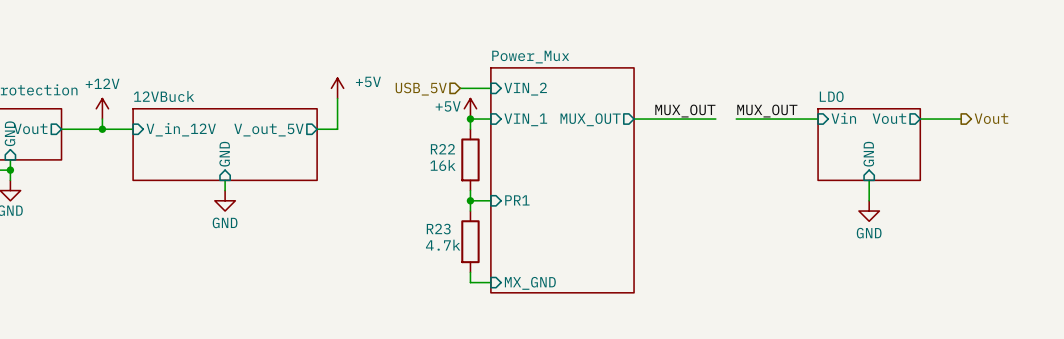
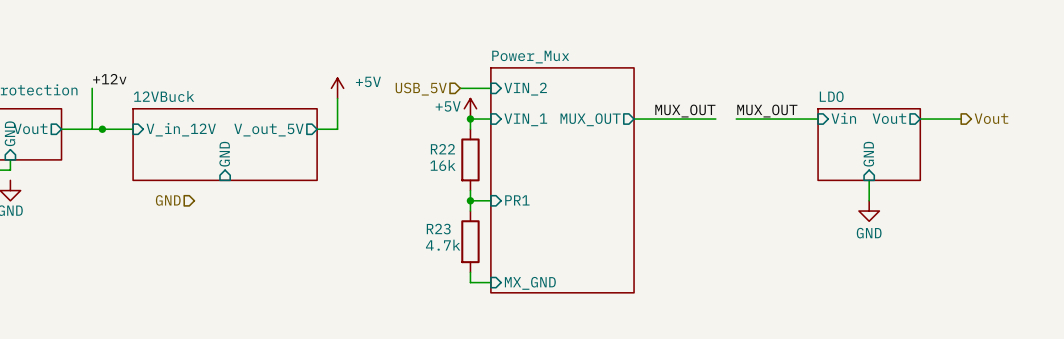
label: none -> +12v (109, 79)
wire: none -> (92, 88) (92, 129)
power symbol: +12V (102, 108) -> none
wire: (102, 119) (102, 129) -> none
wire: (10, 170) (10, 180) -> none
junction: (10, 170) -> none
wire: (225, 180) (225, 190) -> none
hierarchical label: none -> GND (168, 200)
power symbol: GND (225, 200) -> none

